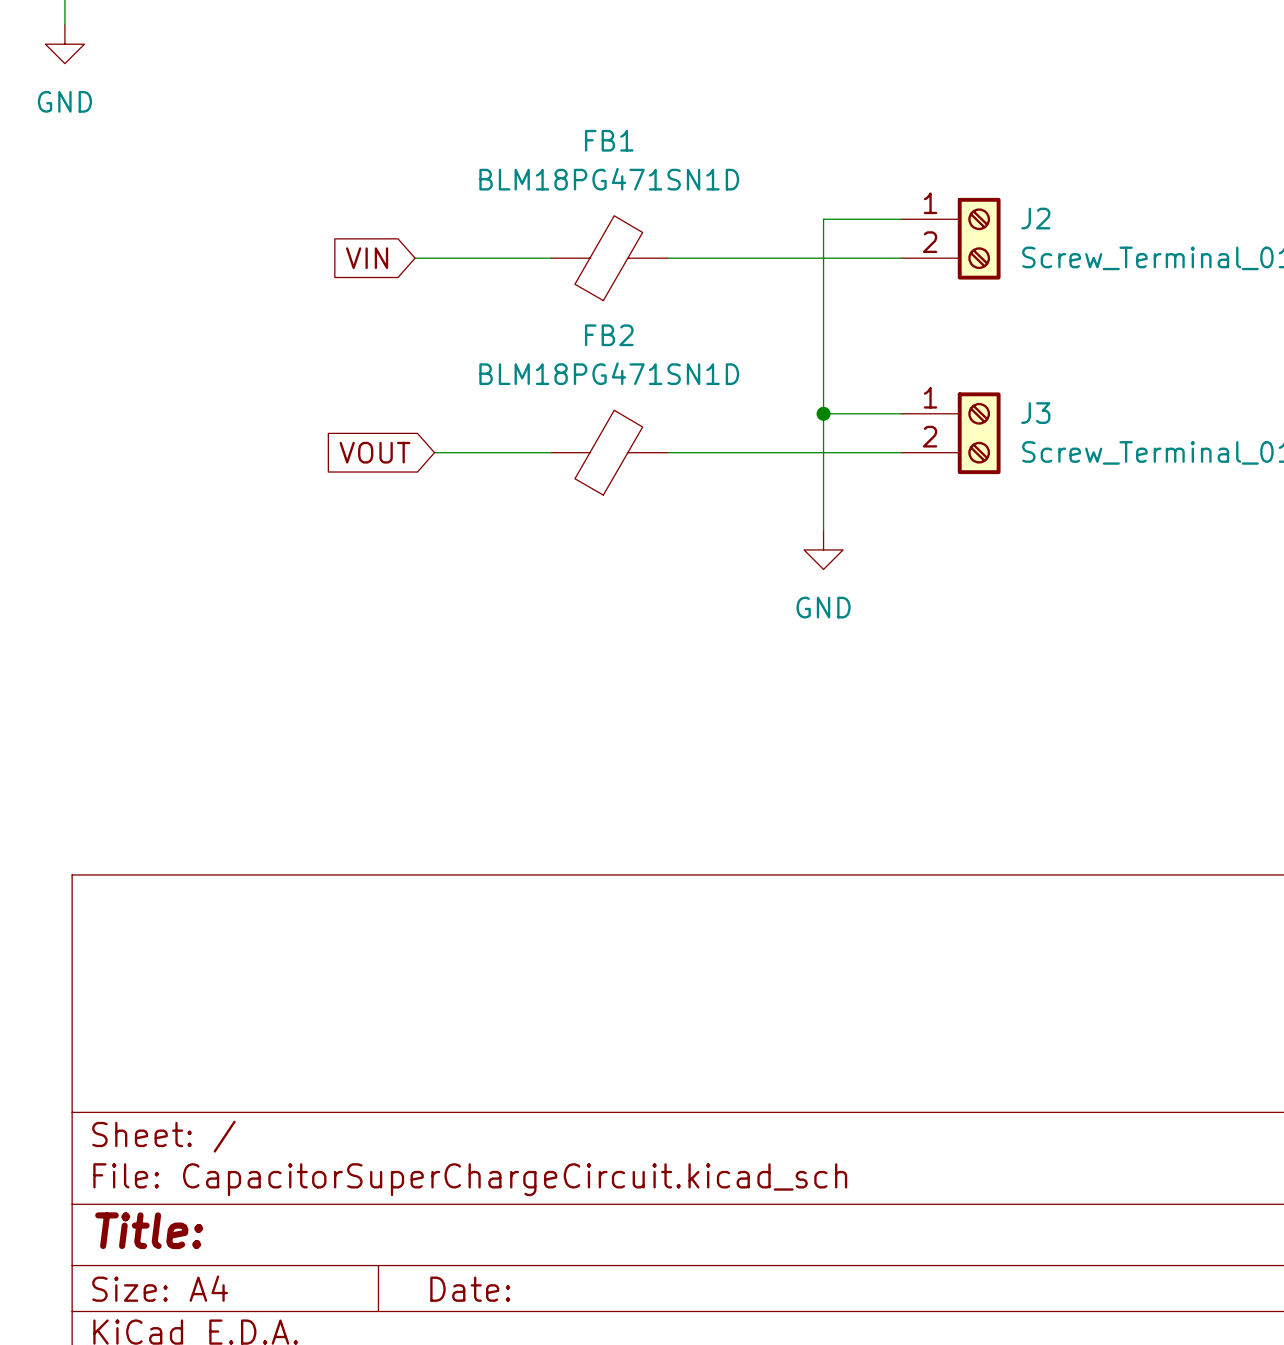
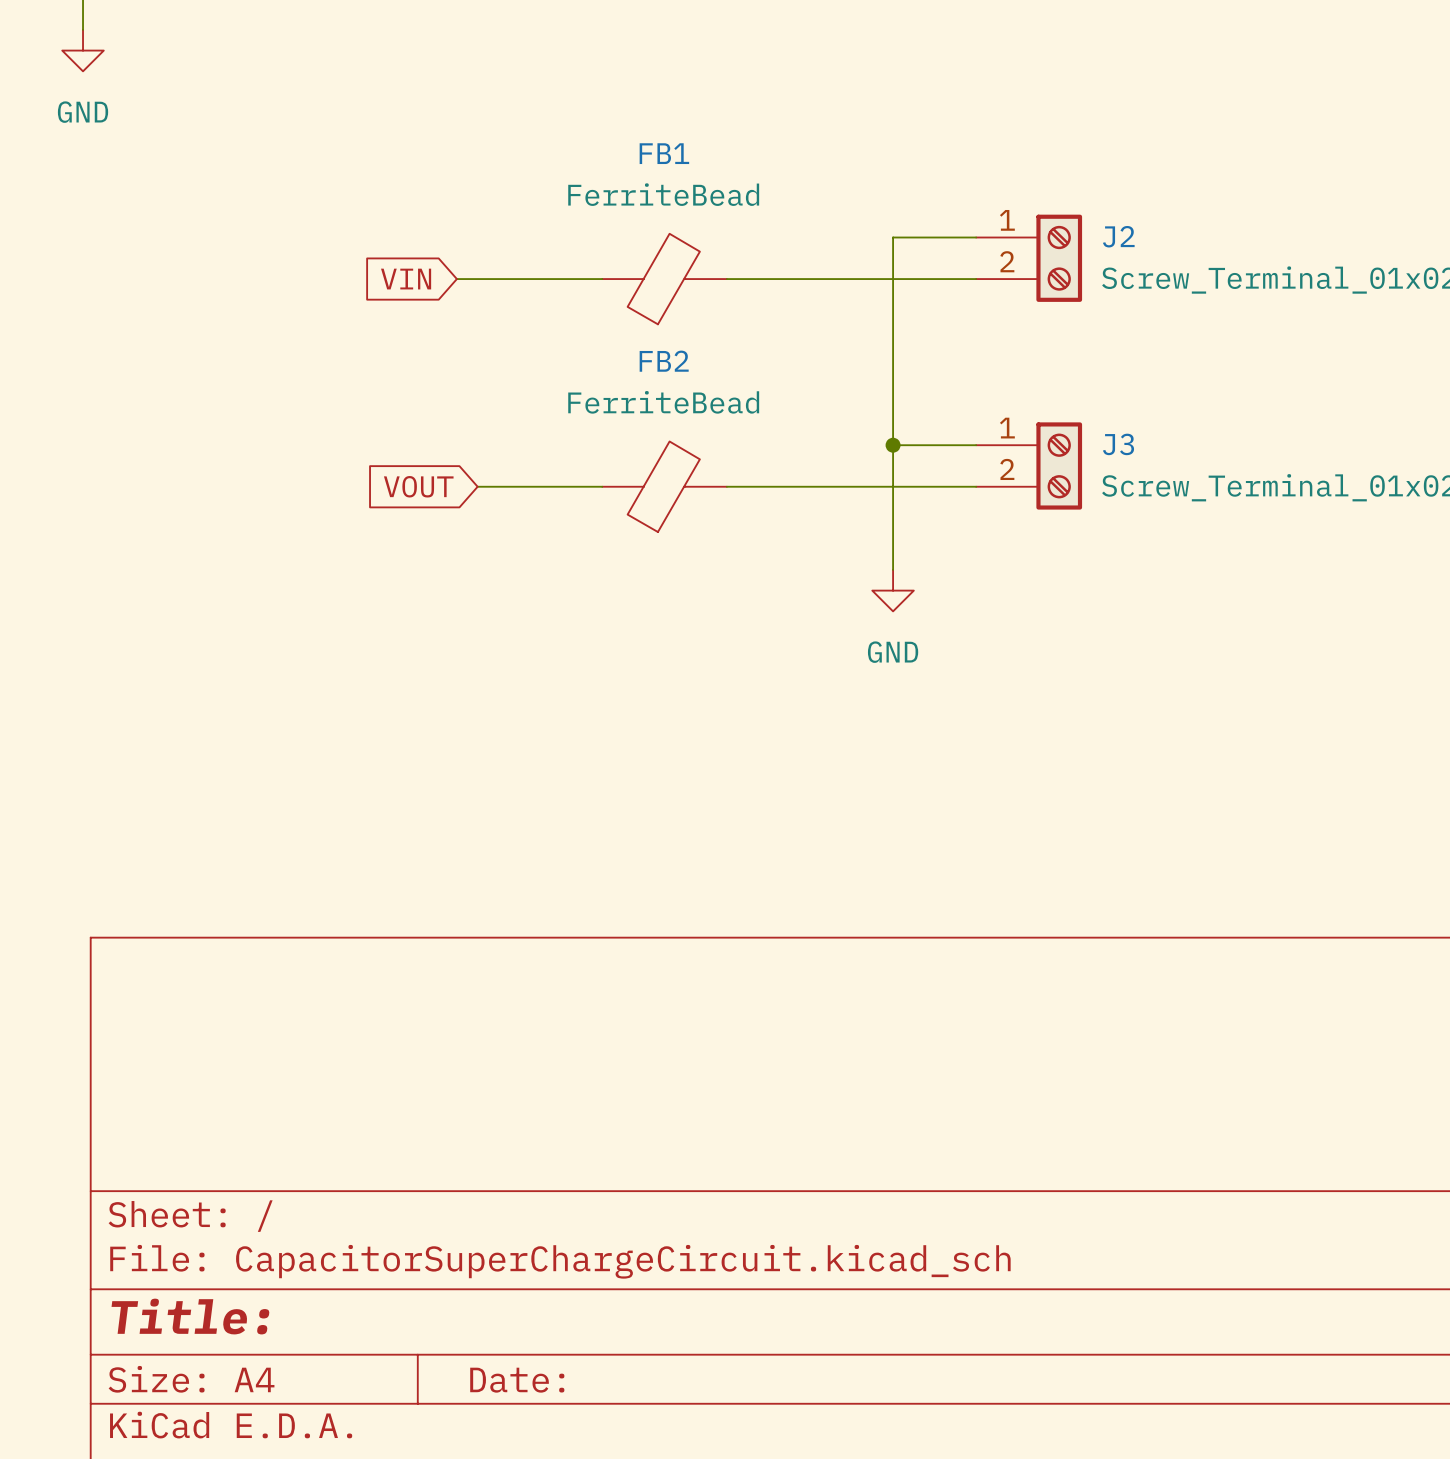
FB1 value: BLM18PG471SN1D (609, 179) -> FerriteBead (663, 194)
FB2 value: BLM18PG471SN1D (609, 373) -> FerriteBead (663, 402)

